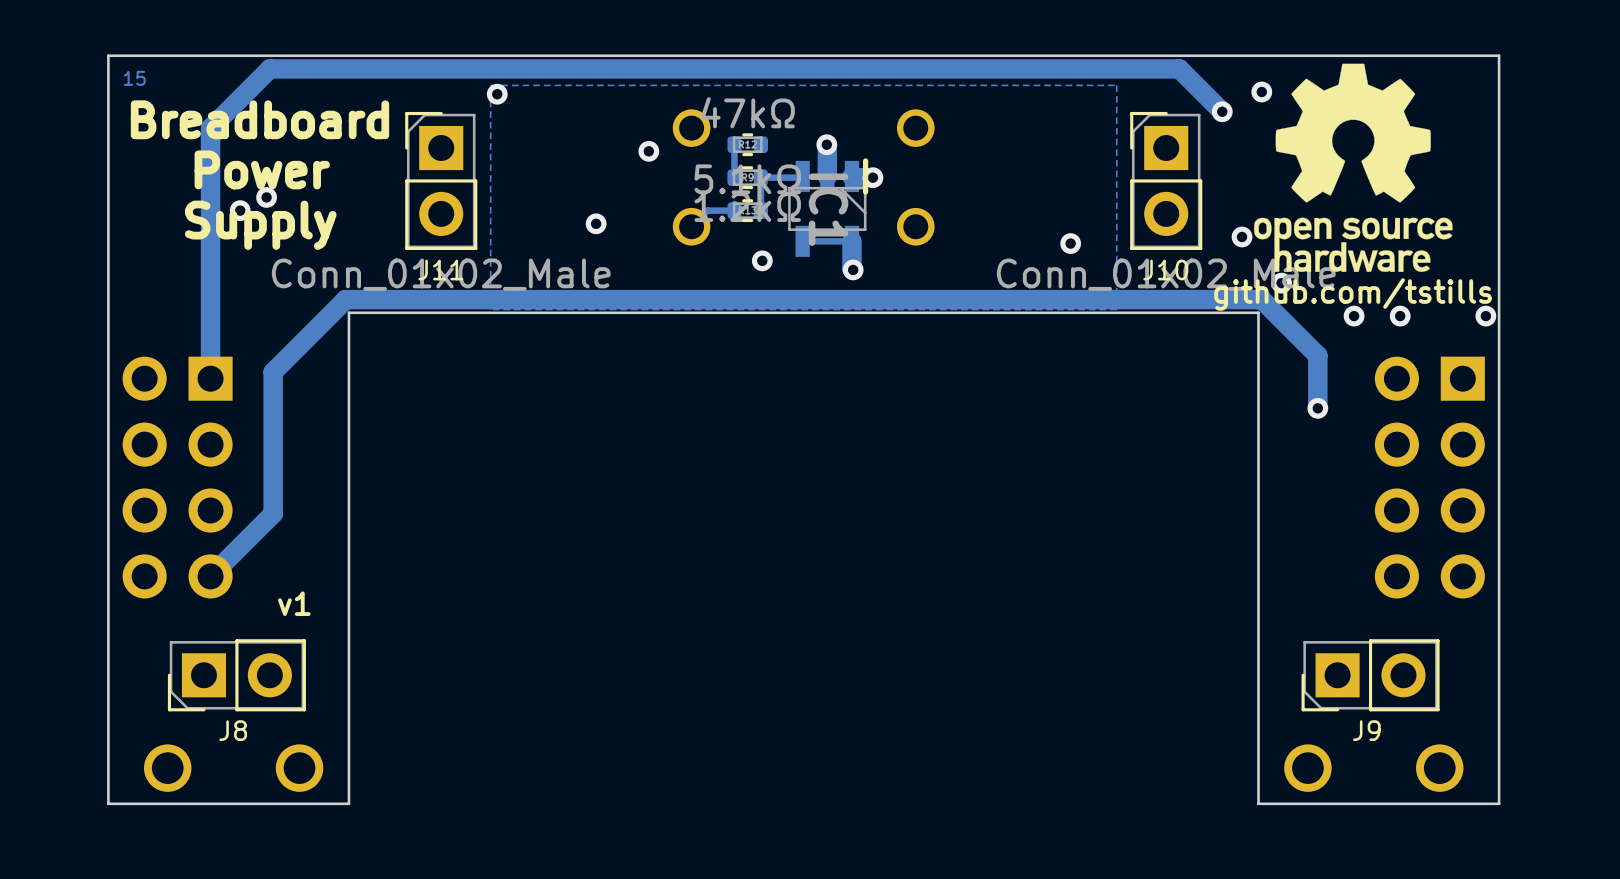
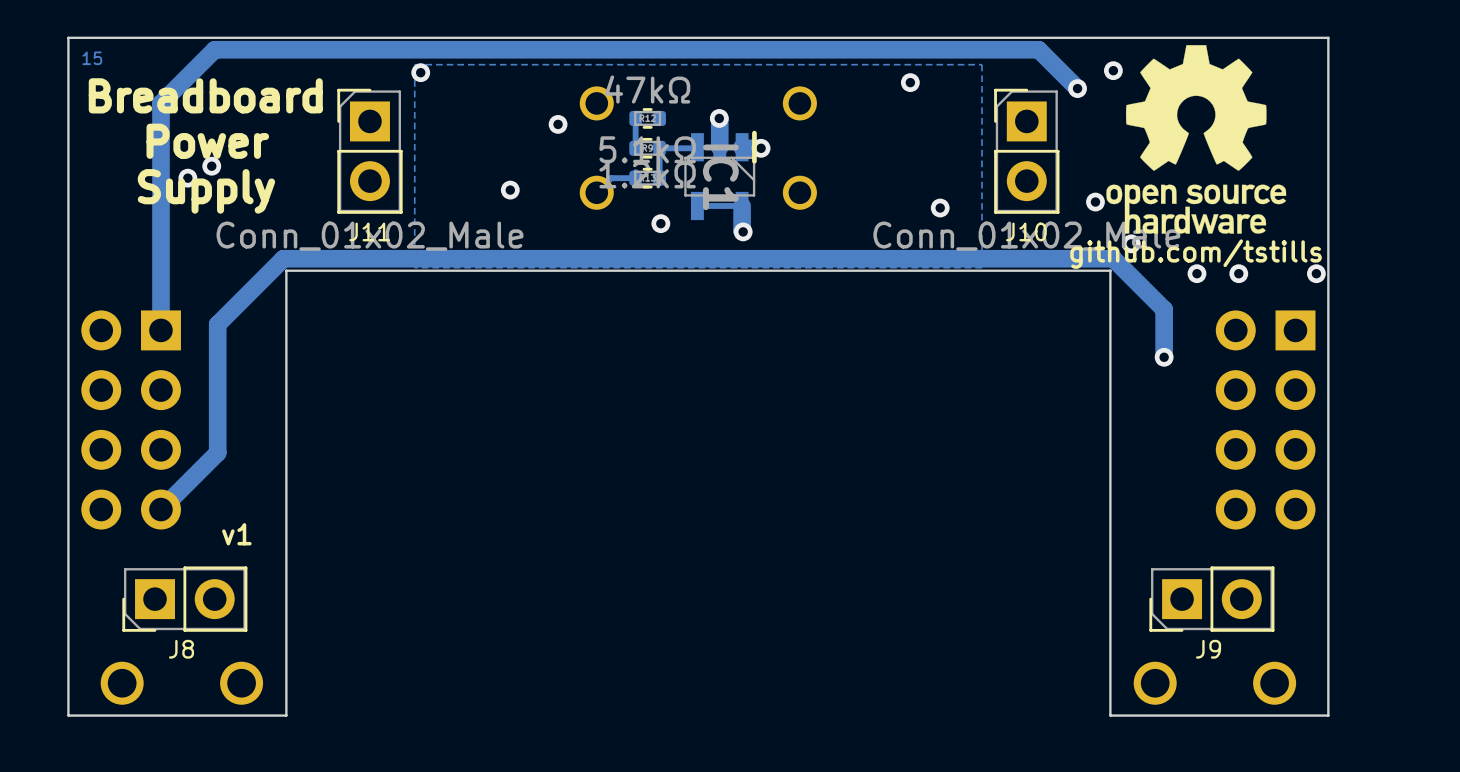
via: none -> (910, 82)

